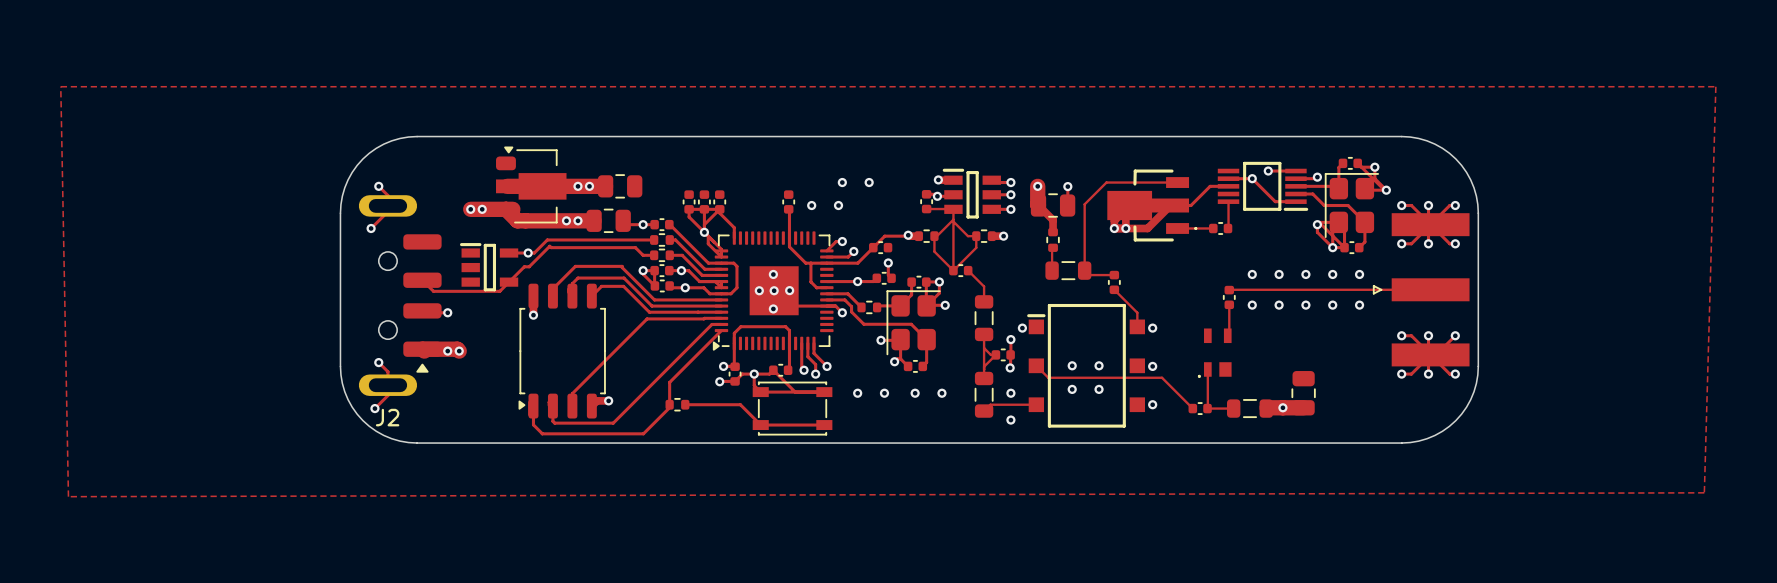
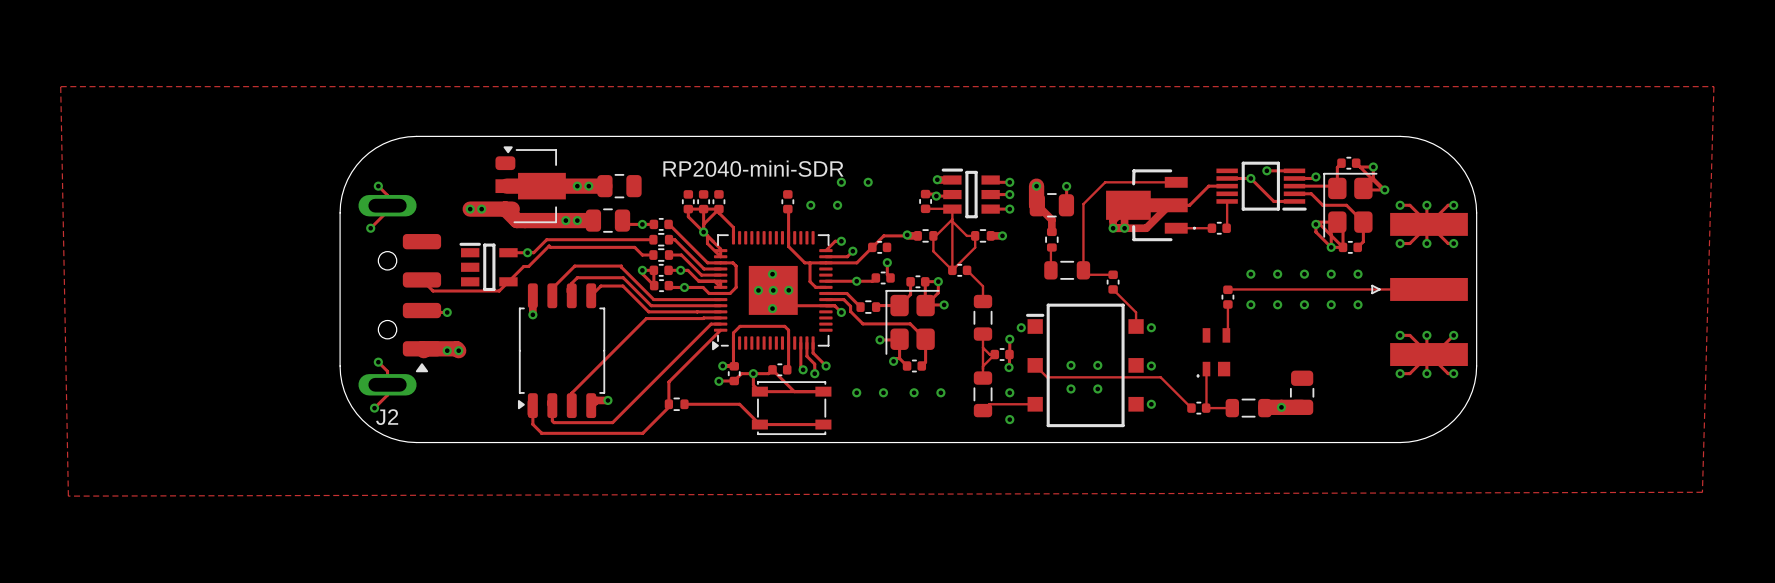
text: none -> RP2040-mini-SDR (753, 168)

